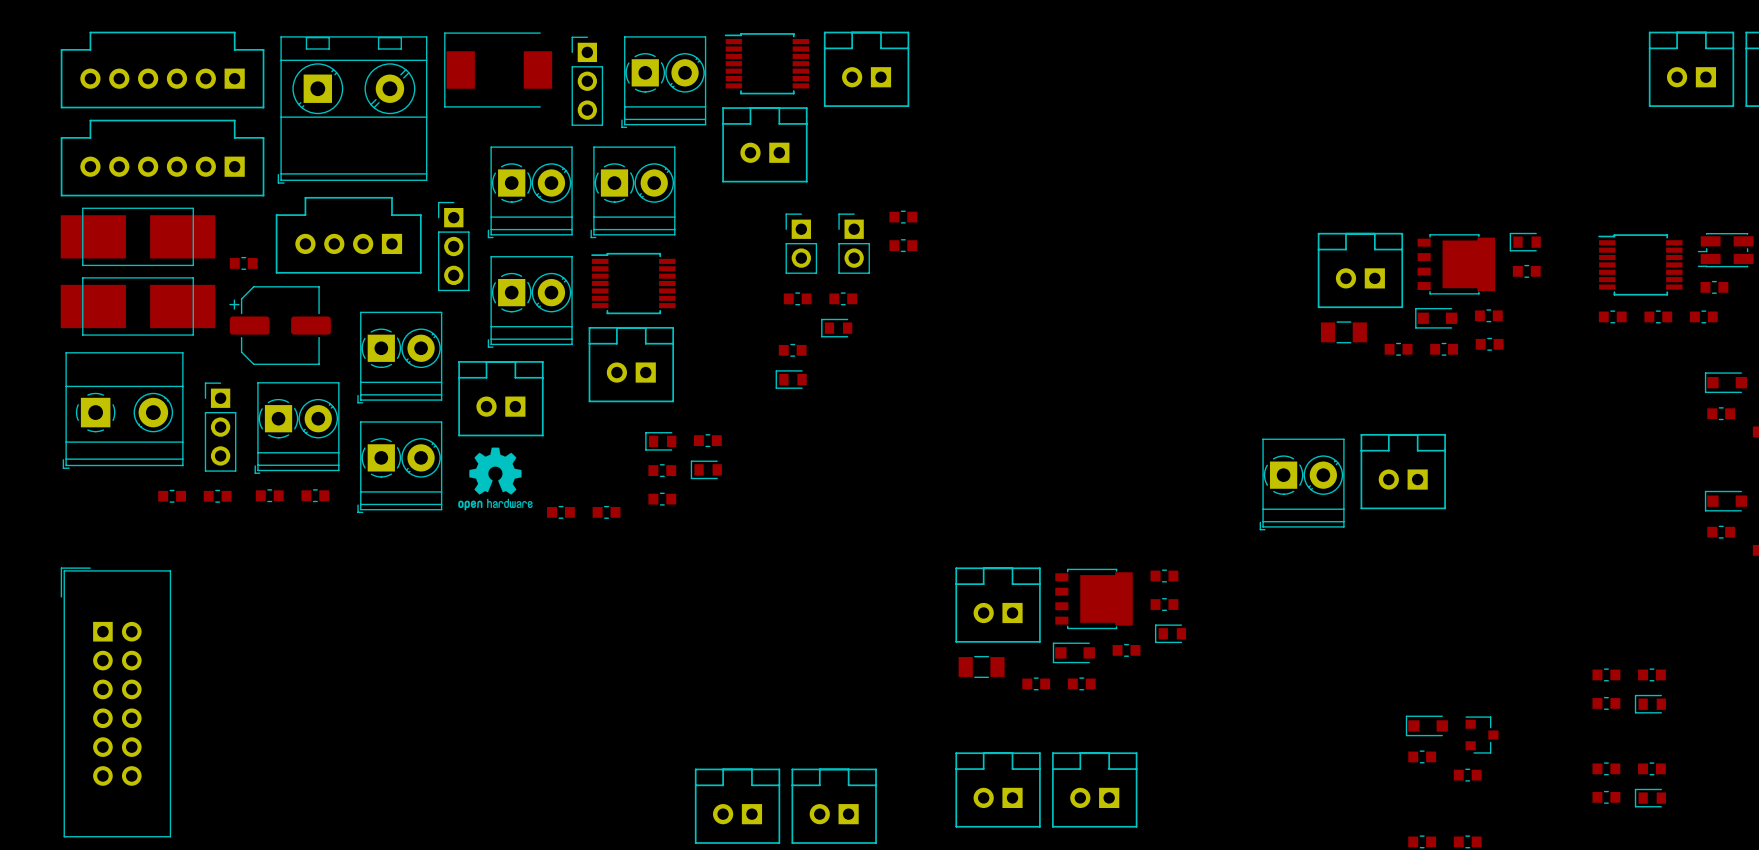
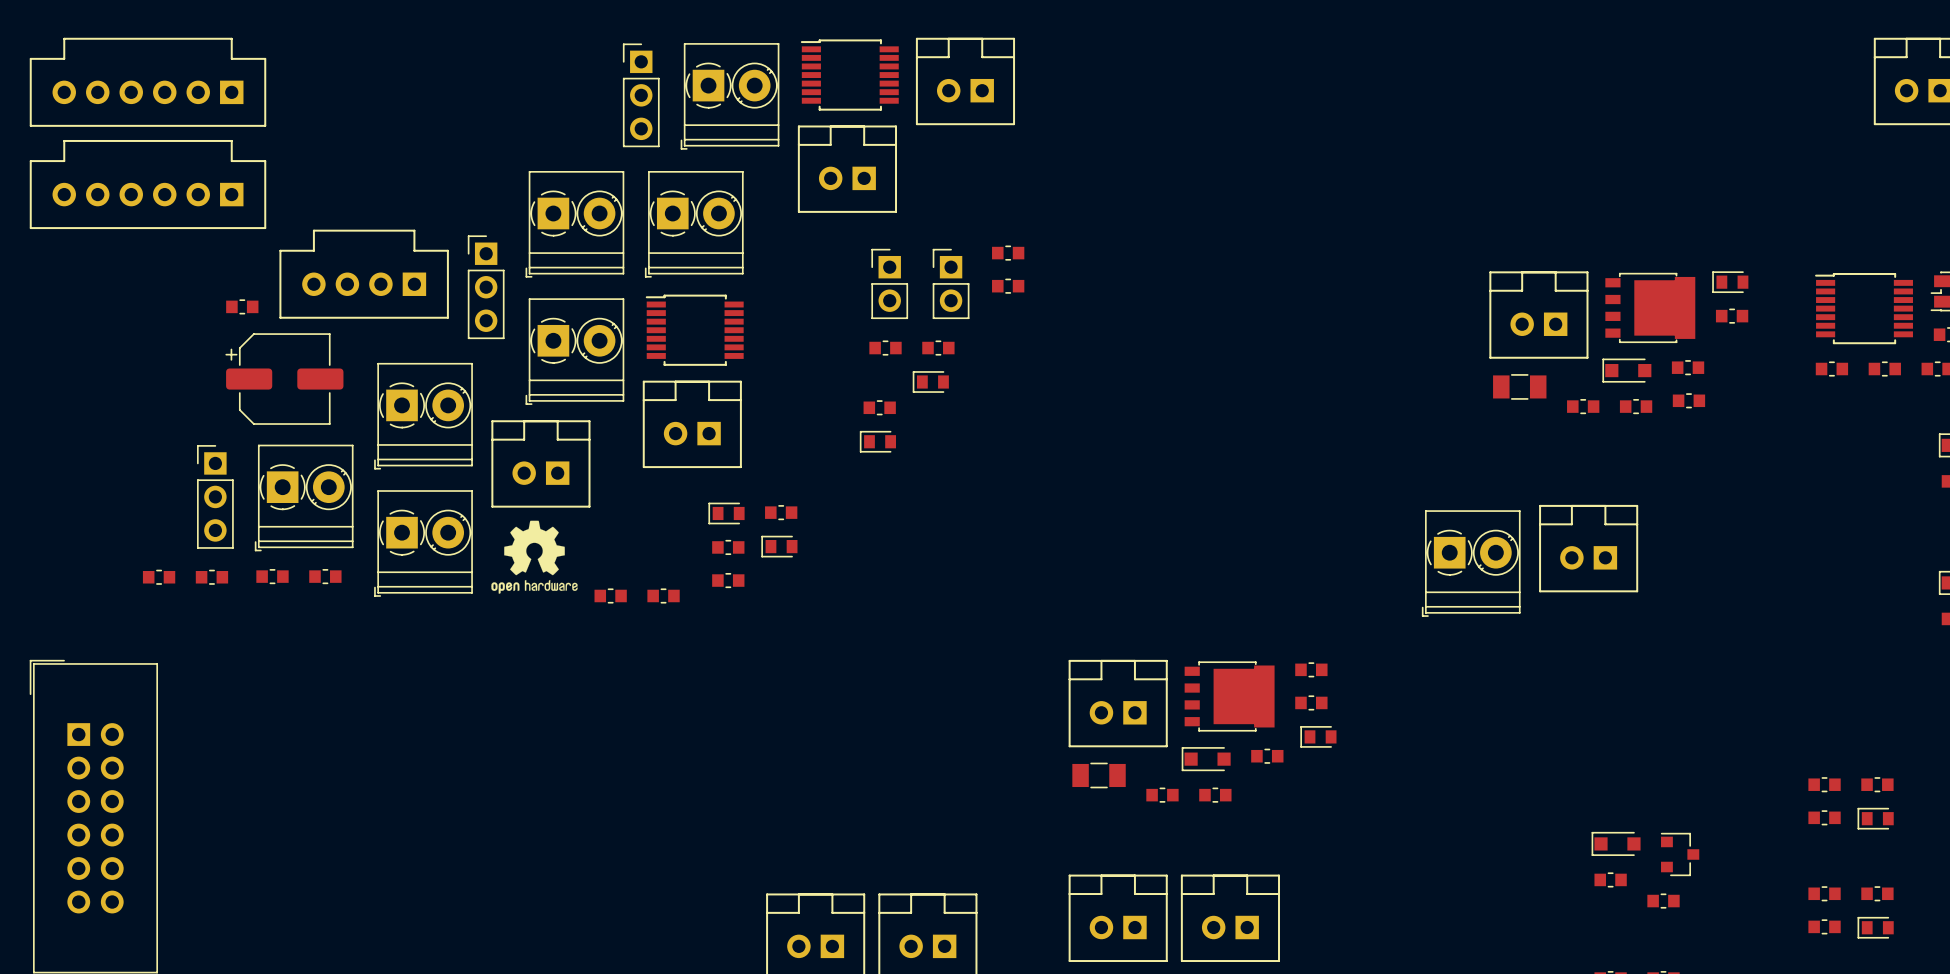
part: (498, 70) -> none
part: (352, 109) -> none
part: (138, 236) -> none
part: (138, 306) -> none
part: (123, 410) -> none

